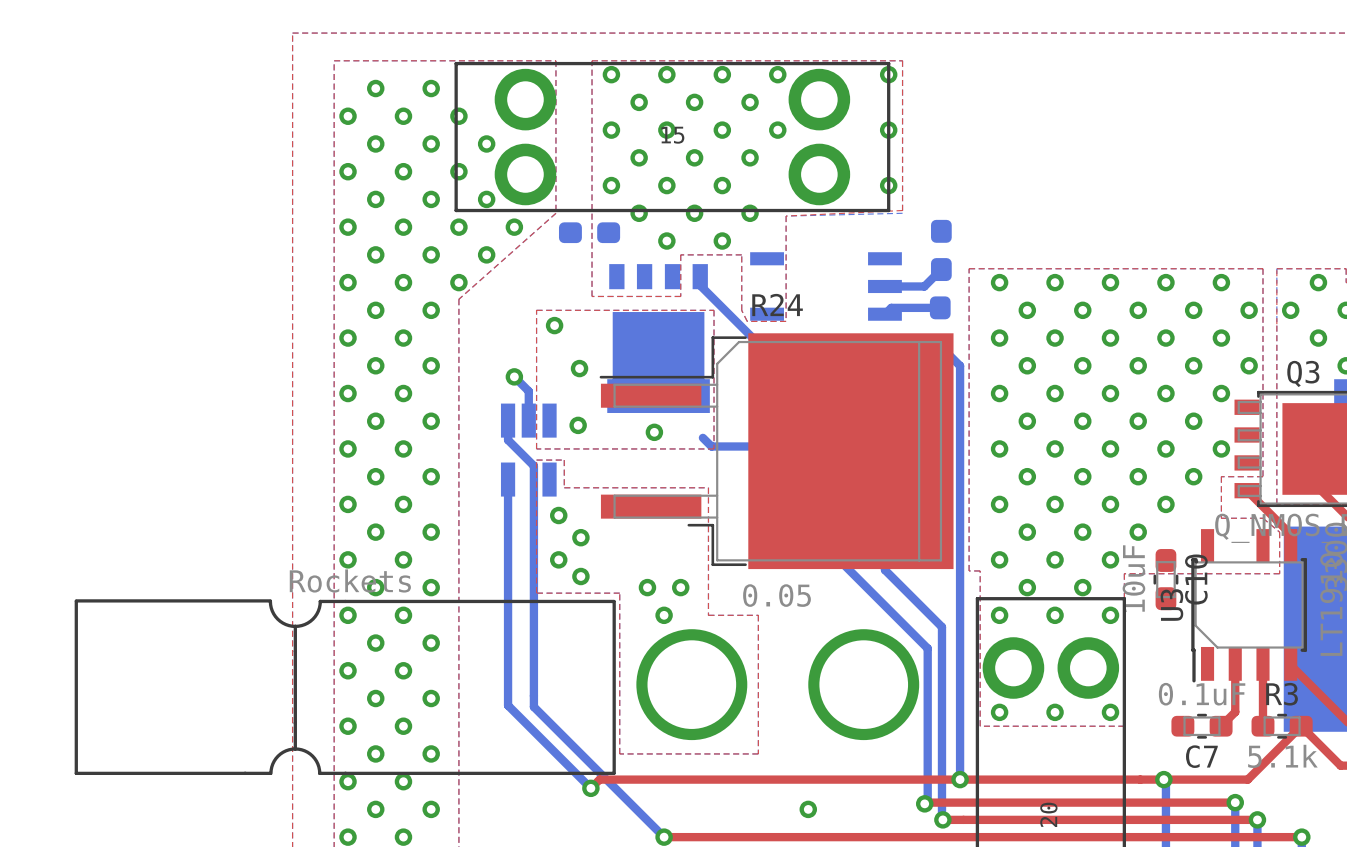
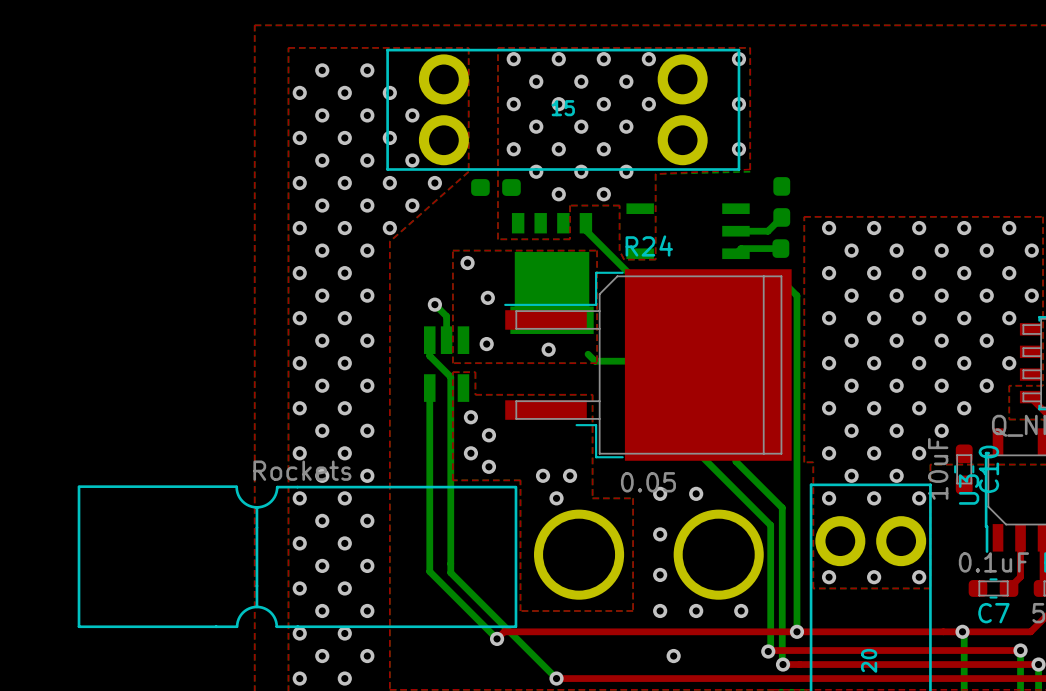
via: none -> (660, 493)
via: none -> (696, 493)
via: none -> (660, 534)
via: none -> (660, 574)
via: none -> (660, 610)
via: none -> (696, 610)
via: none -> (741, 610)

